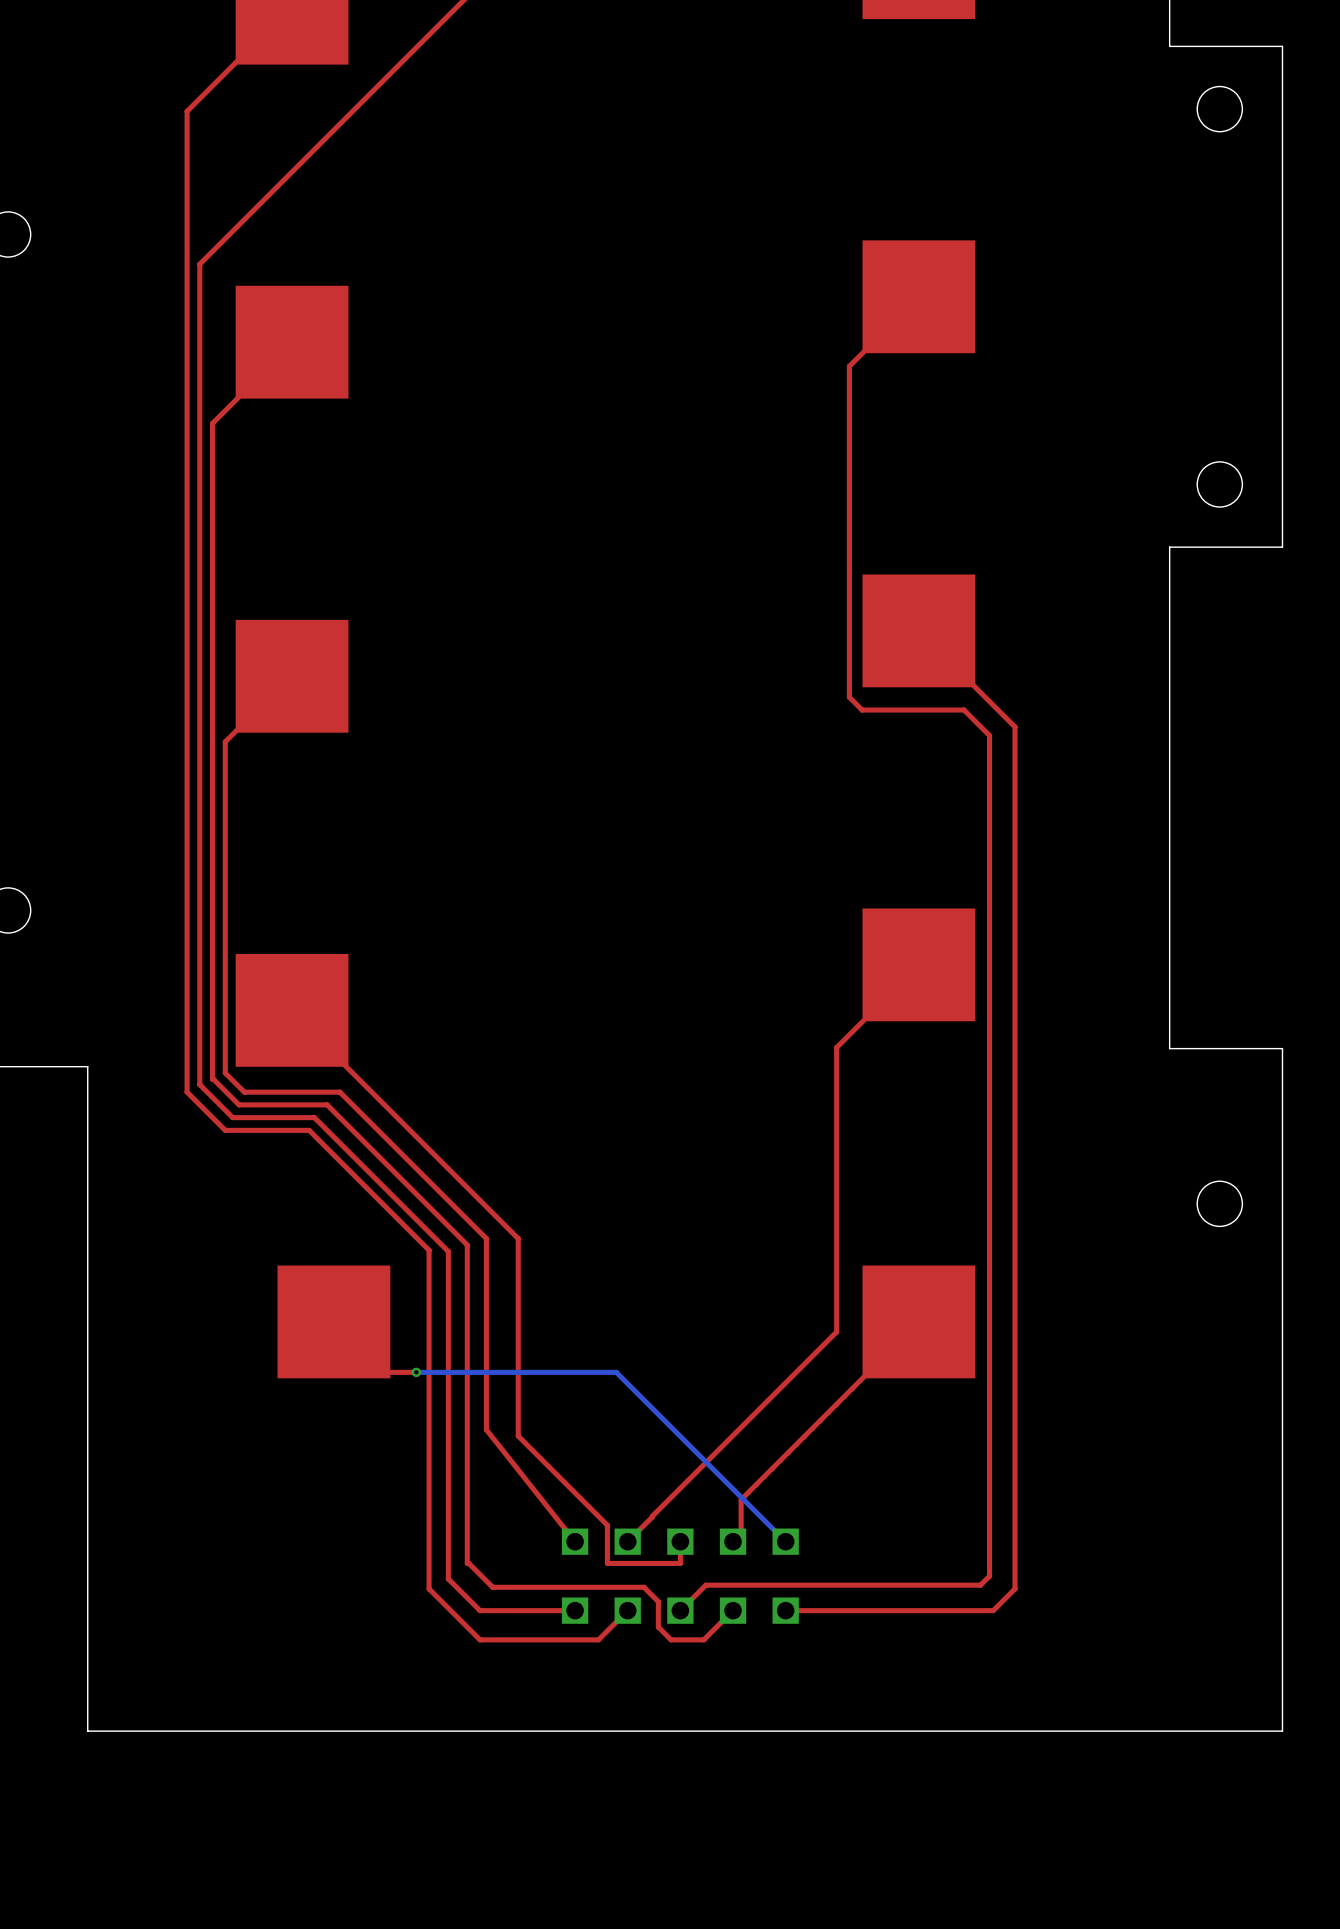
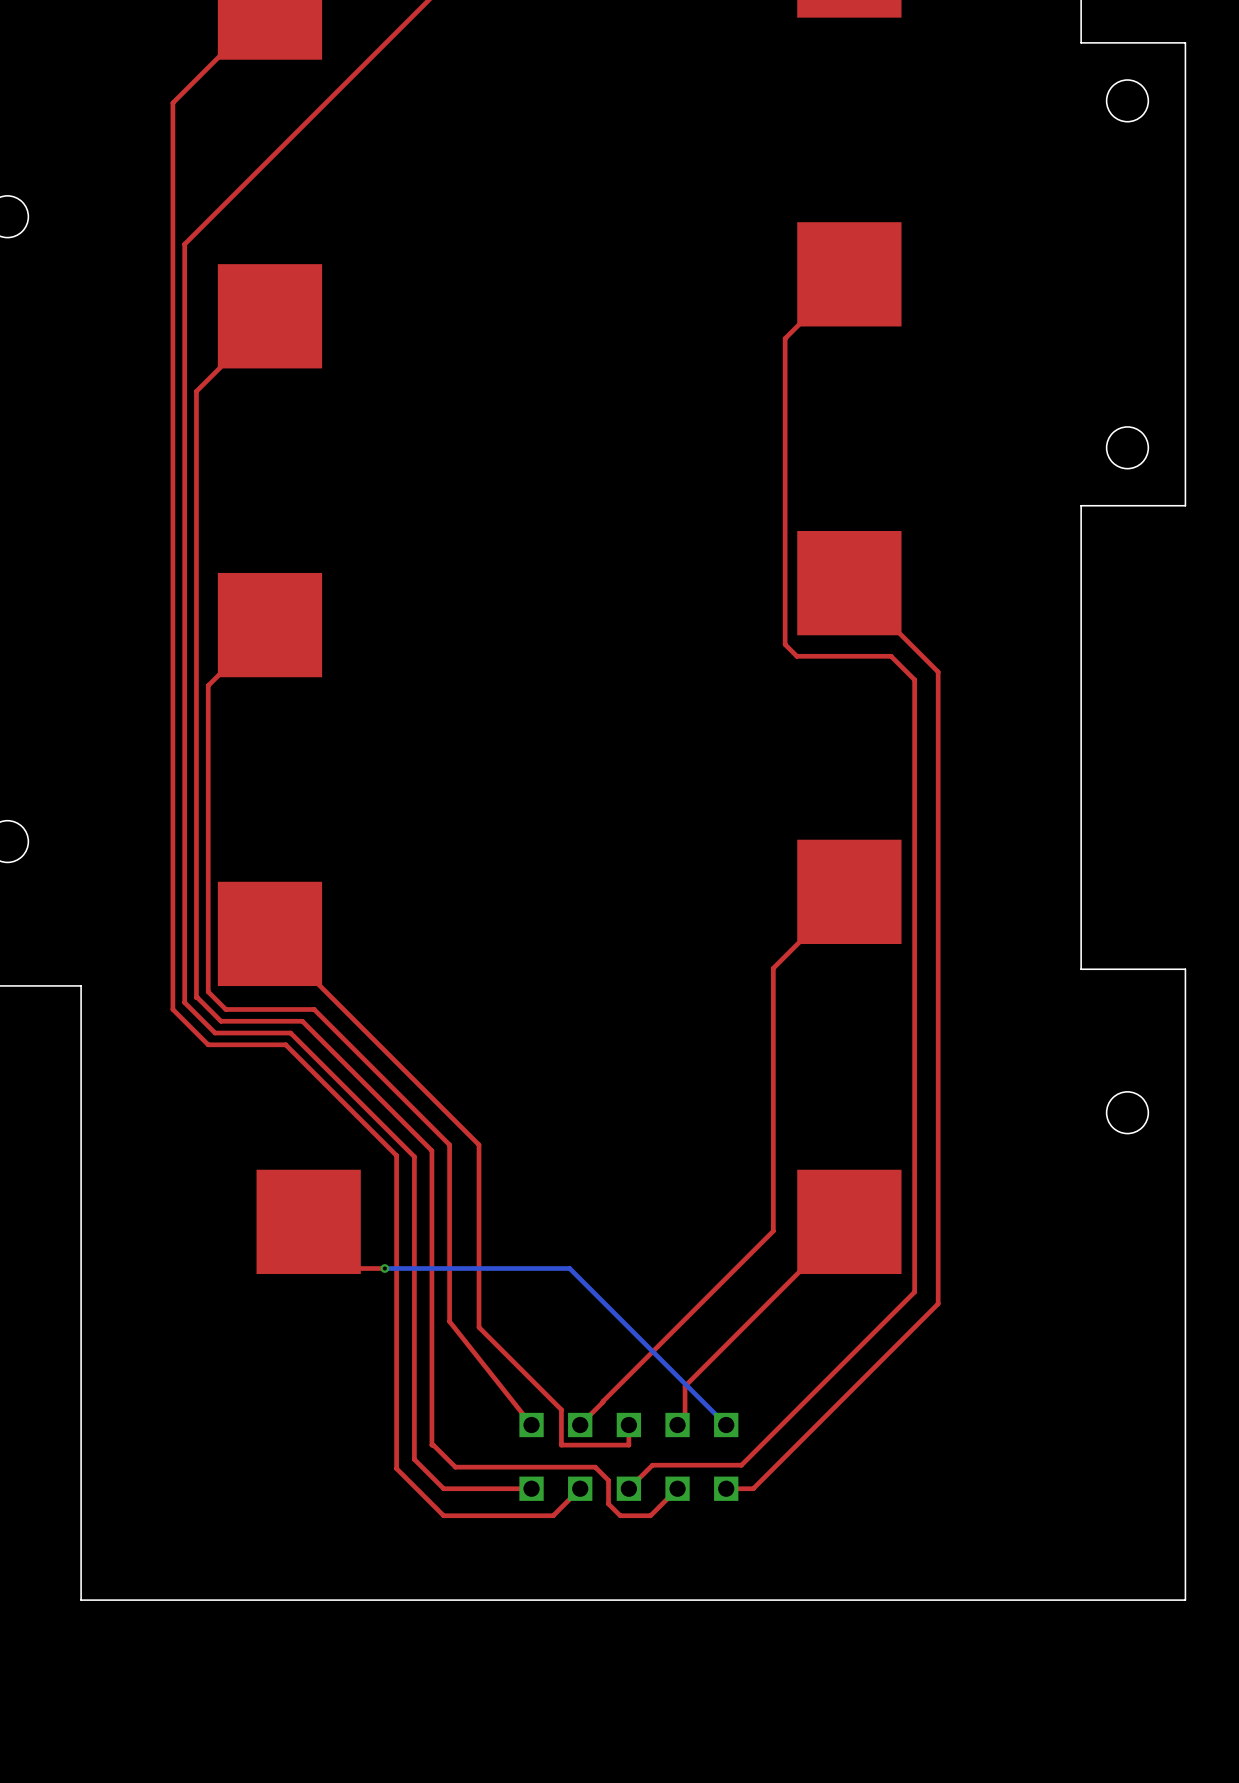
top track: (989, 1397) (989, 1576) (980, 1585) (802, 1585) -> (914, 1292) (741, 1465)
top track: (1015, 1410) (1015, 1588) (993, 1610) (814, 1610) -> (938, 1303) (753, 1488)

